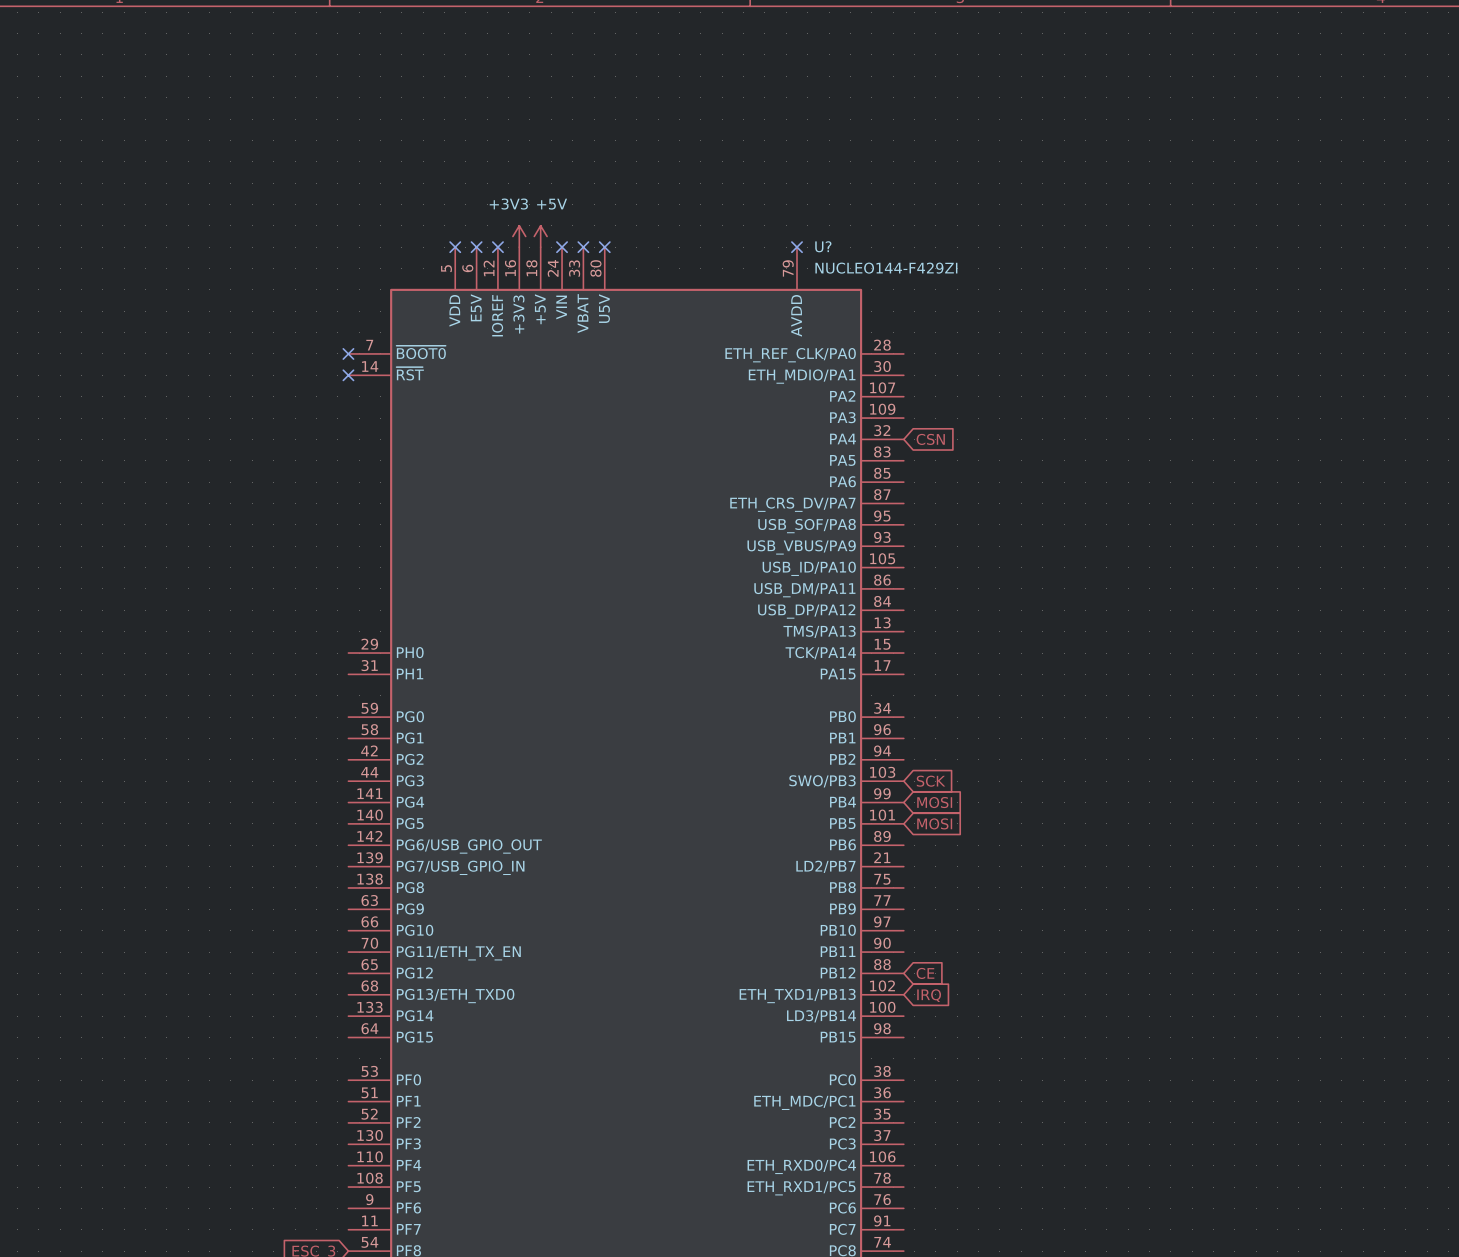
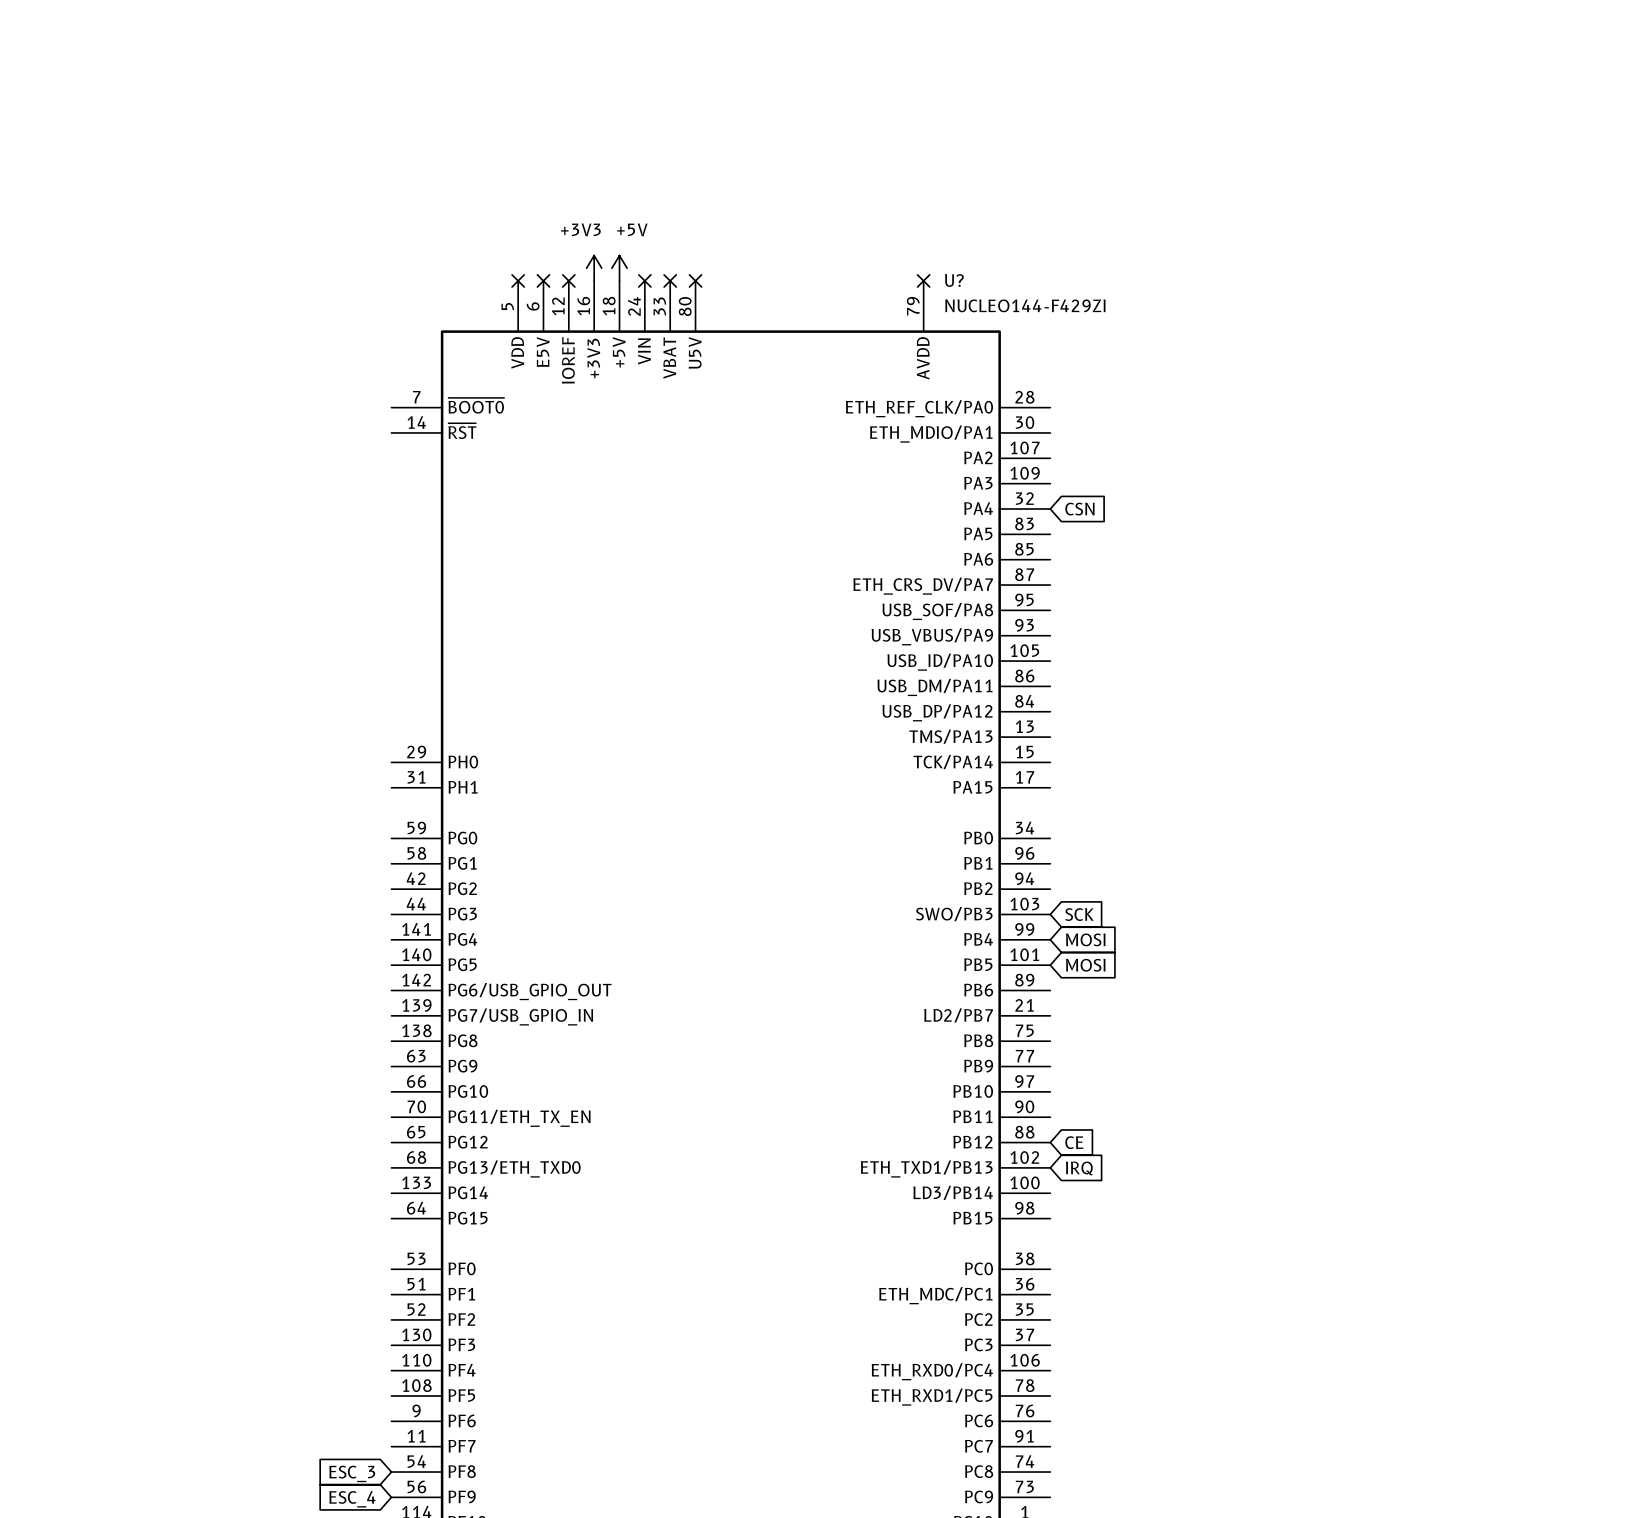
no-connect mark: (348, 353) -> none
no-connect mark: (348, 375) -> none

